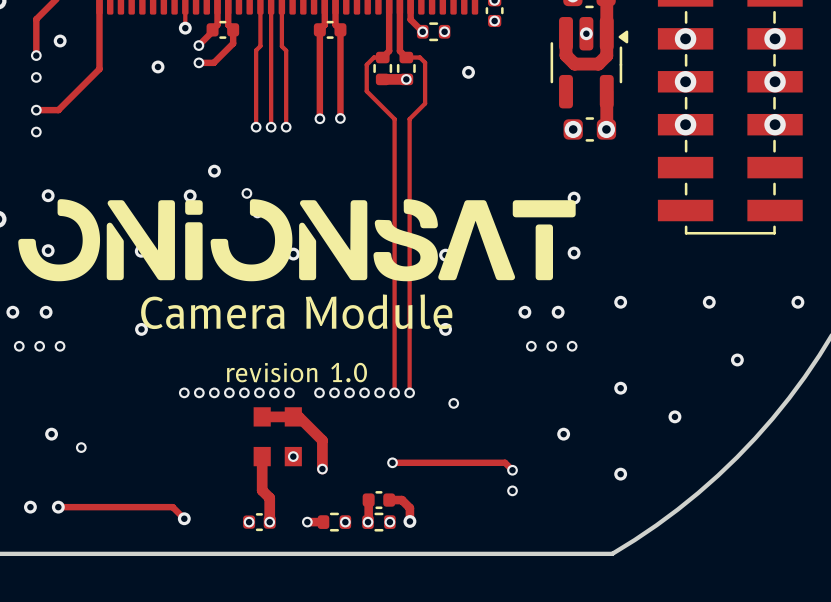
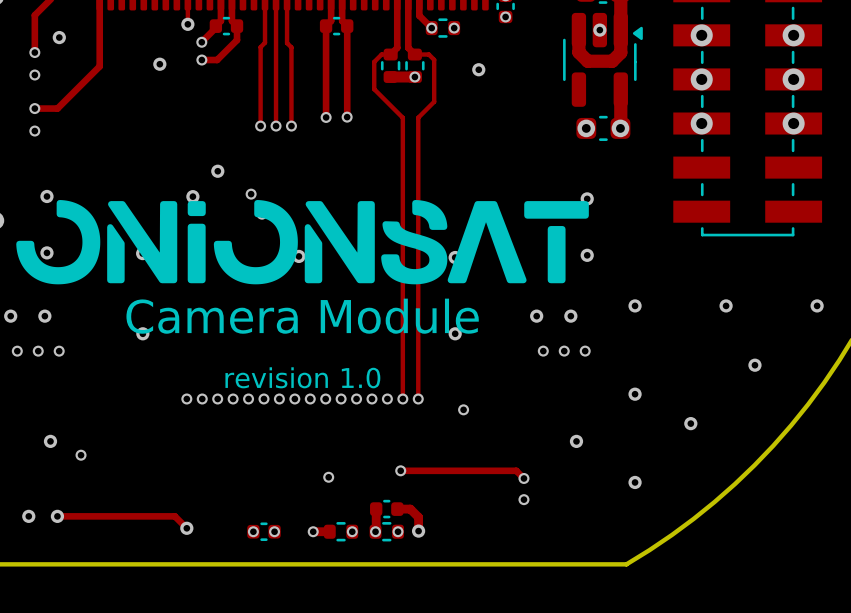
track: (262, 416) (298, 416) (322, 440) (322, 469) -> none
part: (277, 436) -> none
track: (262, 456) (262, 490) (269, 498) (269, 522) -> none
via position: (293, 456) -> (310, 398)

